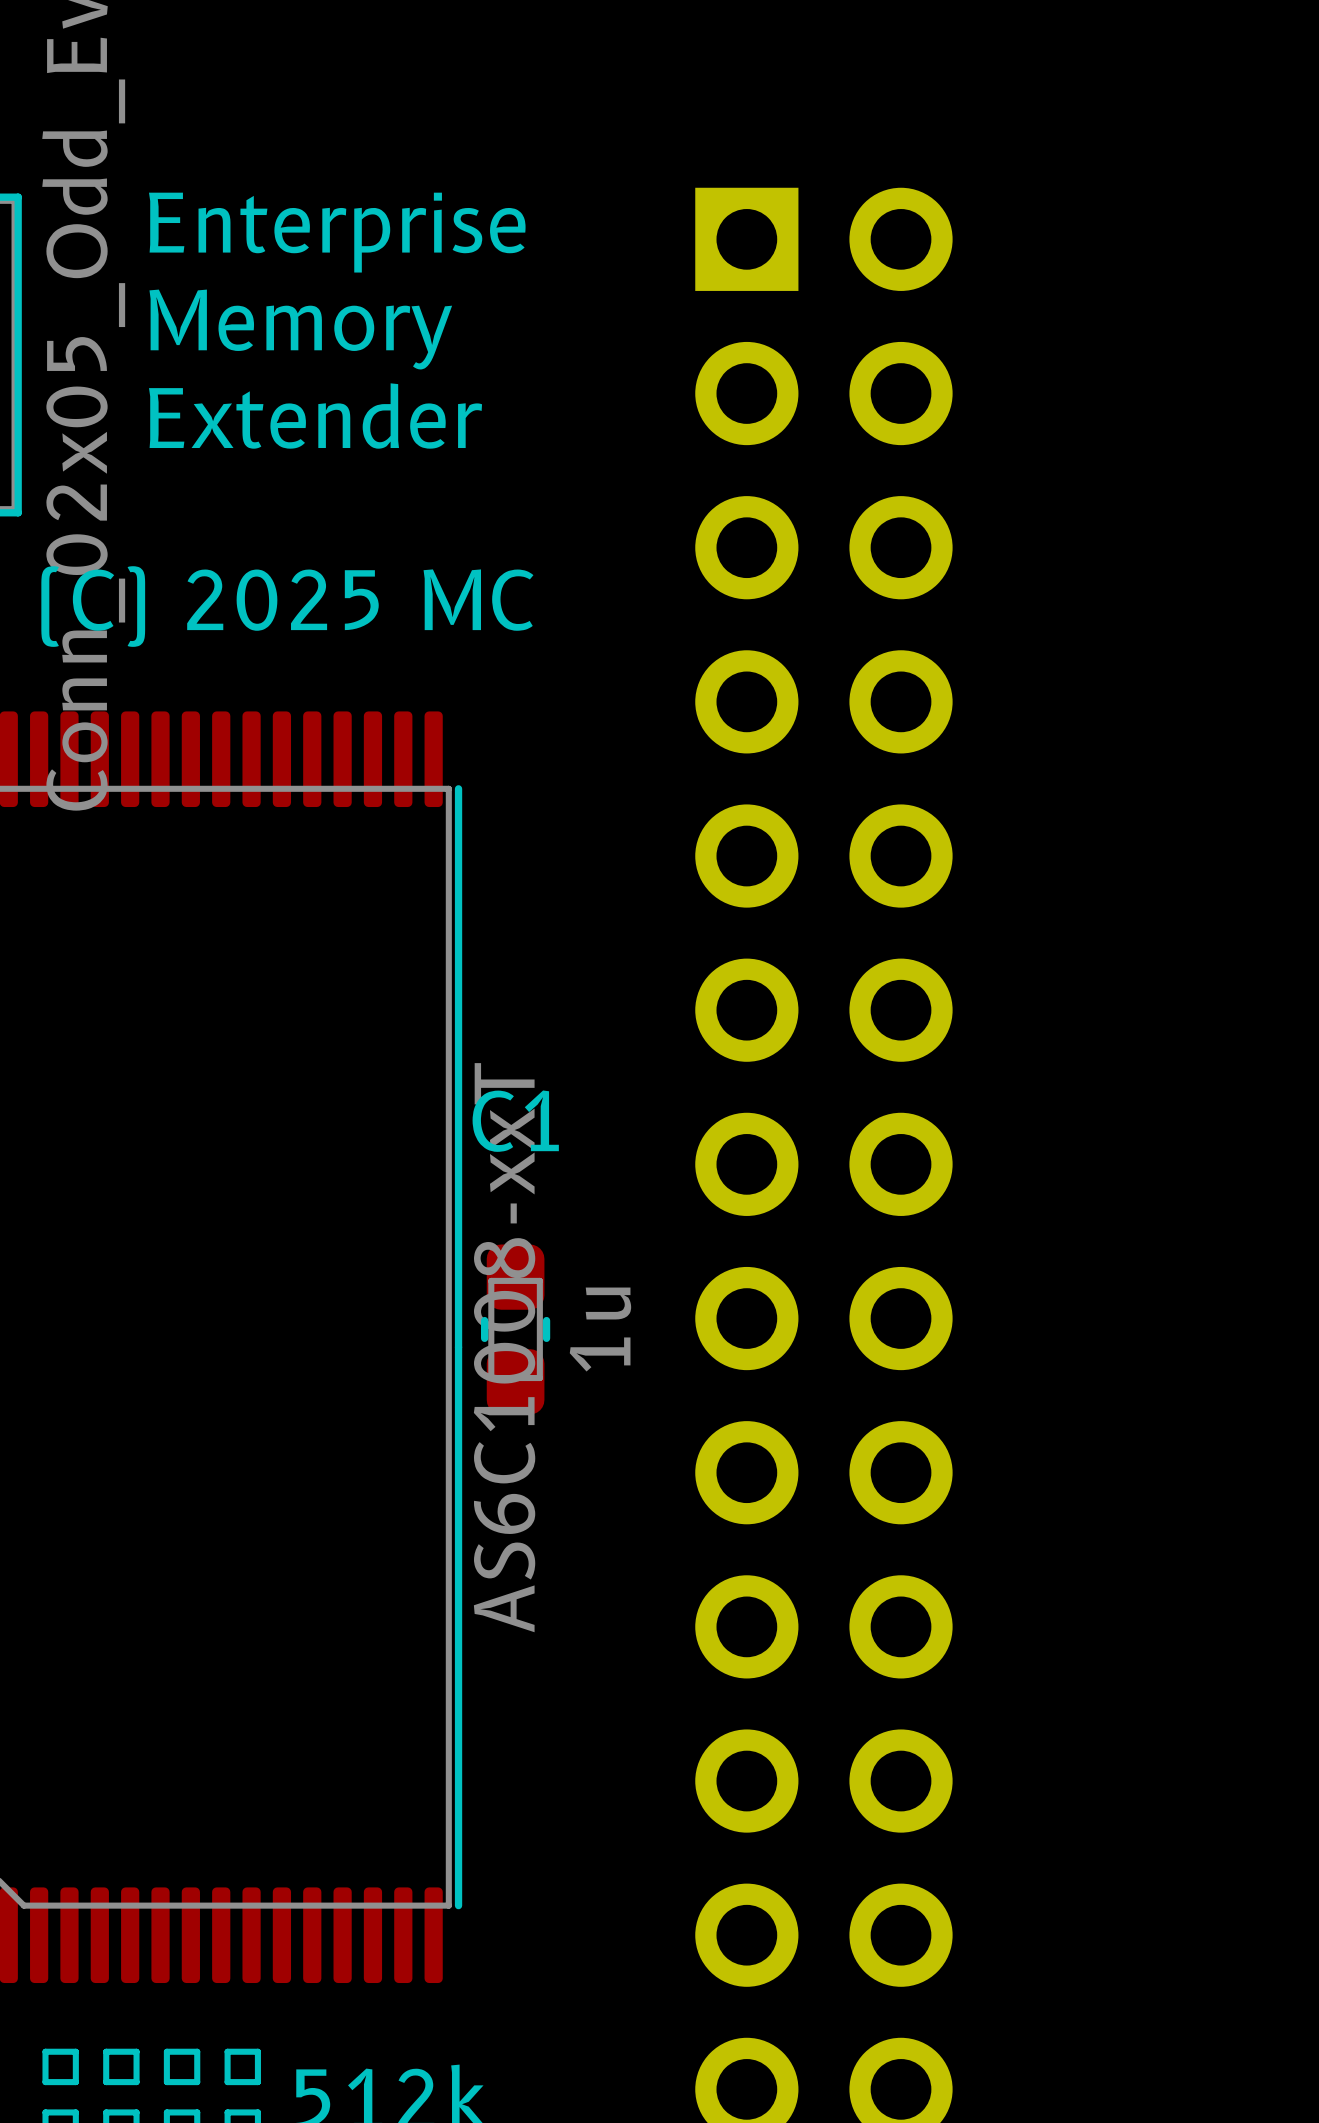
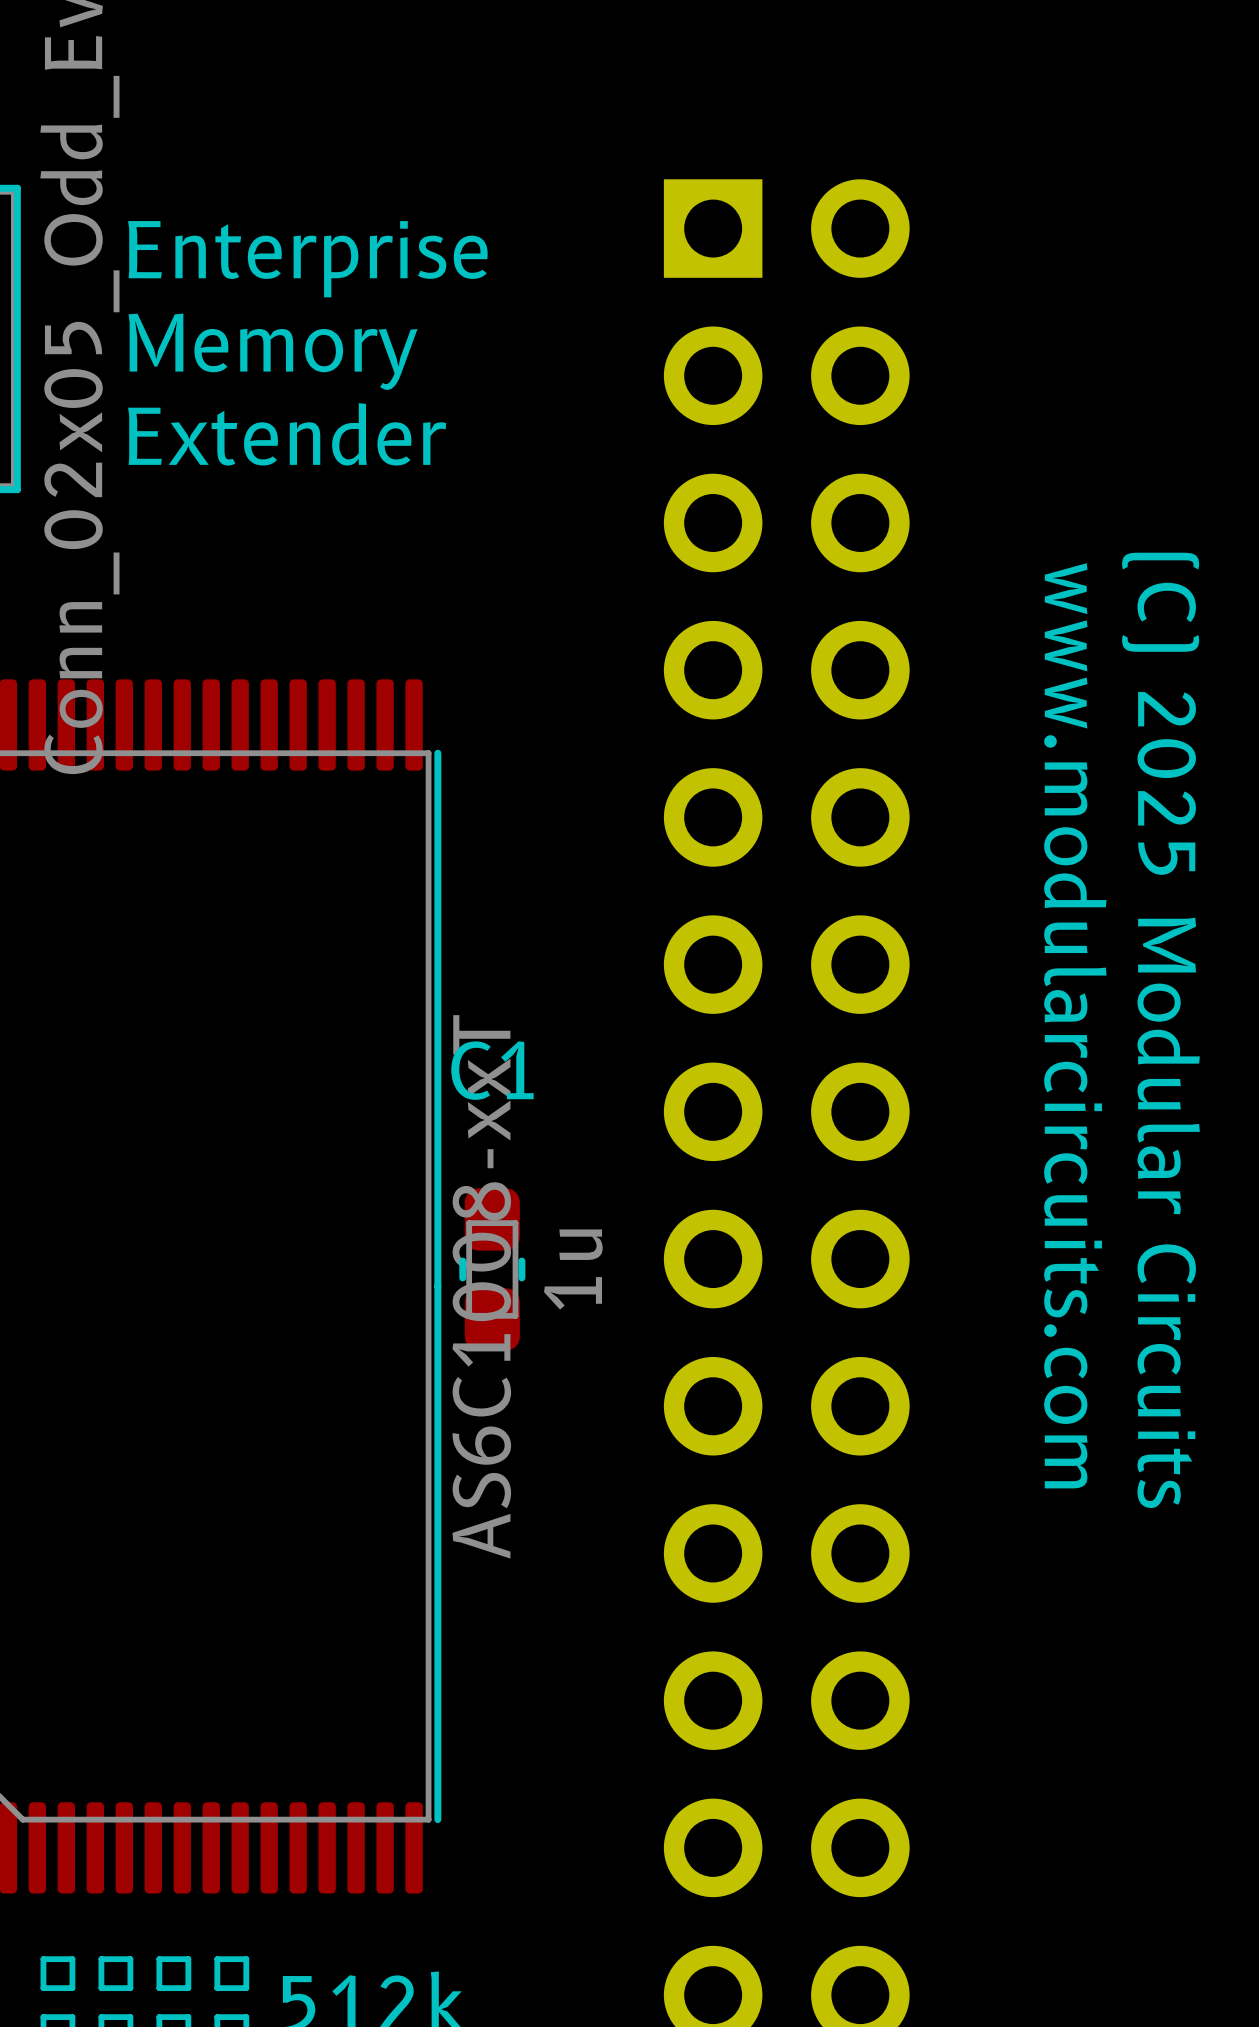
text position: Enterprise (337, 232) -> Enterprise (307, 259)
text position: Memory (300, 329) -> Memory (273, 351)
text position: Extender (315, 416) -> Extender (287, 434)
text: (C) 2025 MC (287, 606) -> none
text: none -> www.modularcircuits.com (1075, 1025)
text: none -> (C) 2025 Modular Circuits (1160, 1030)

